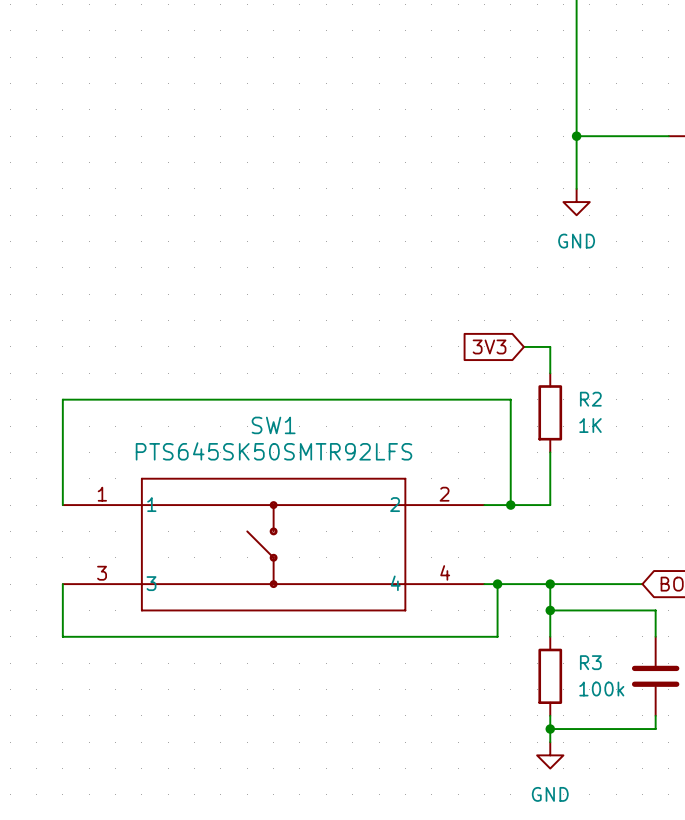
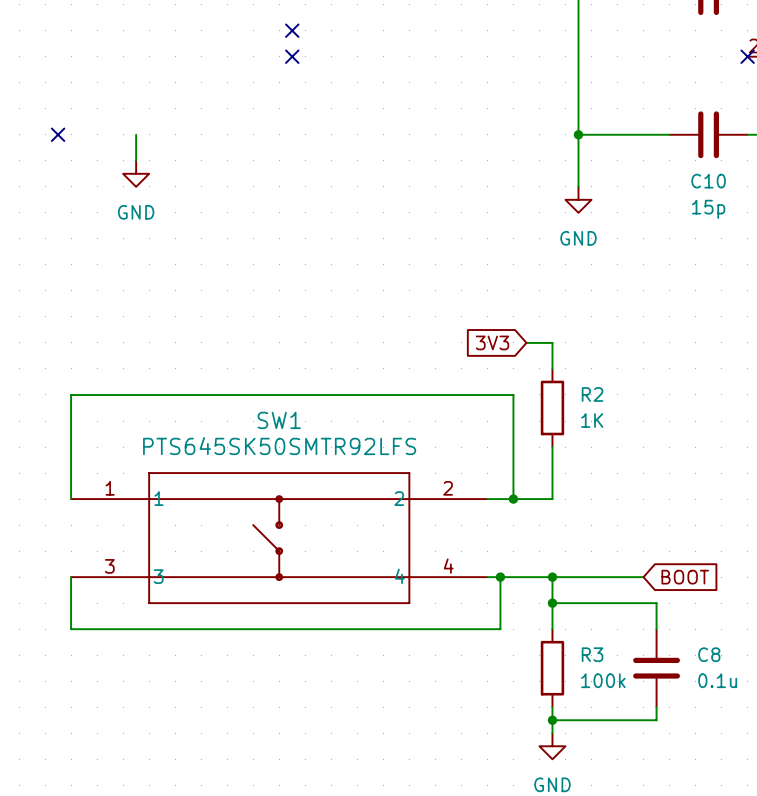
no-connect mark: none -> (292, 30)
no-connect mark: none -> (292, 56)
no-connect mark: none -> (58, 134)
wire: none -> (136, 134) (136, 160)
power symbol: none -> GND (136, 173)

